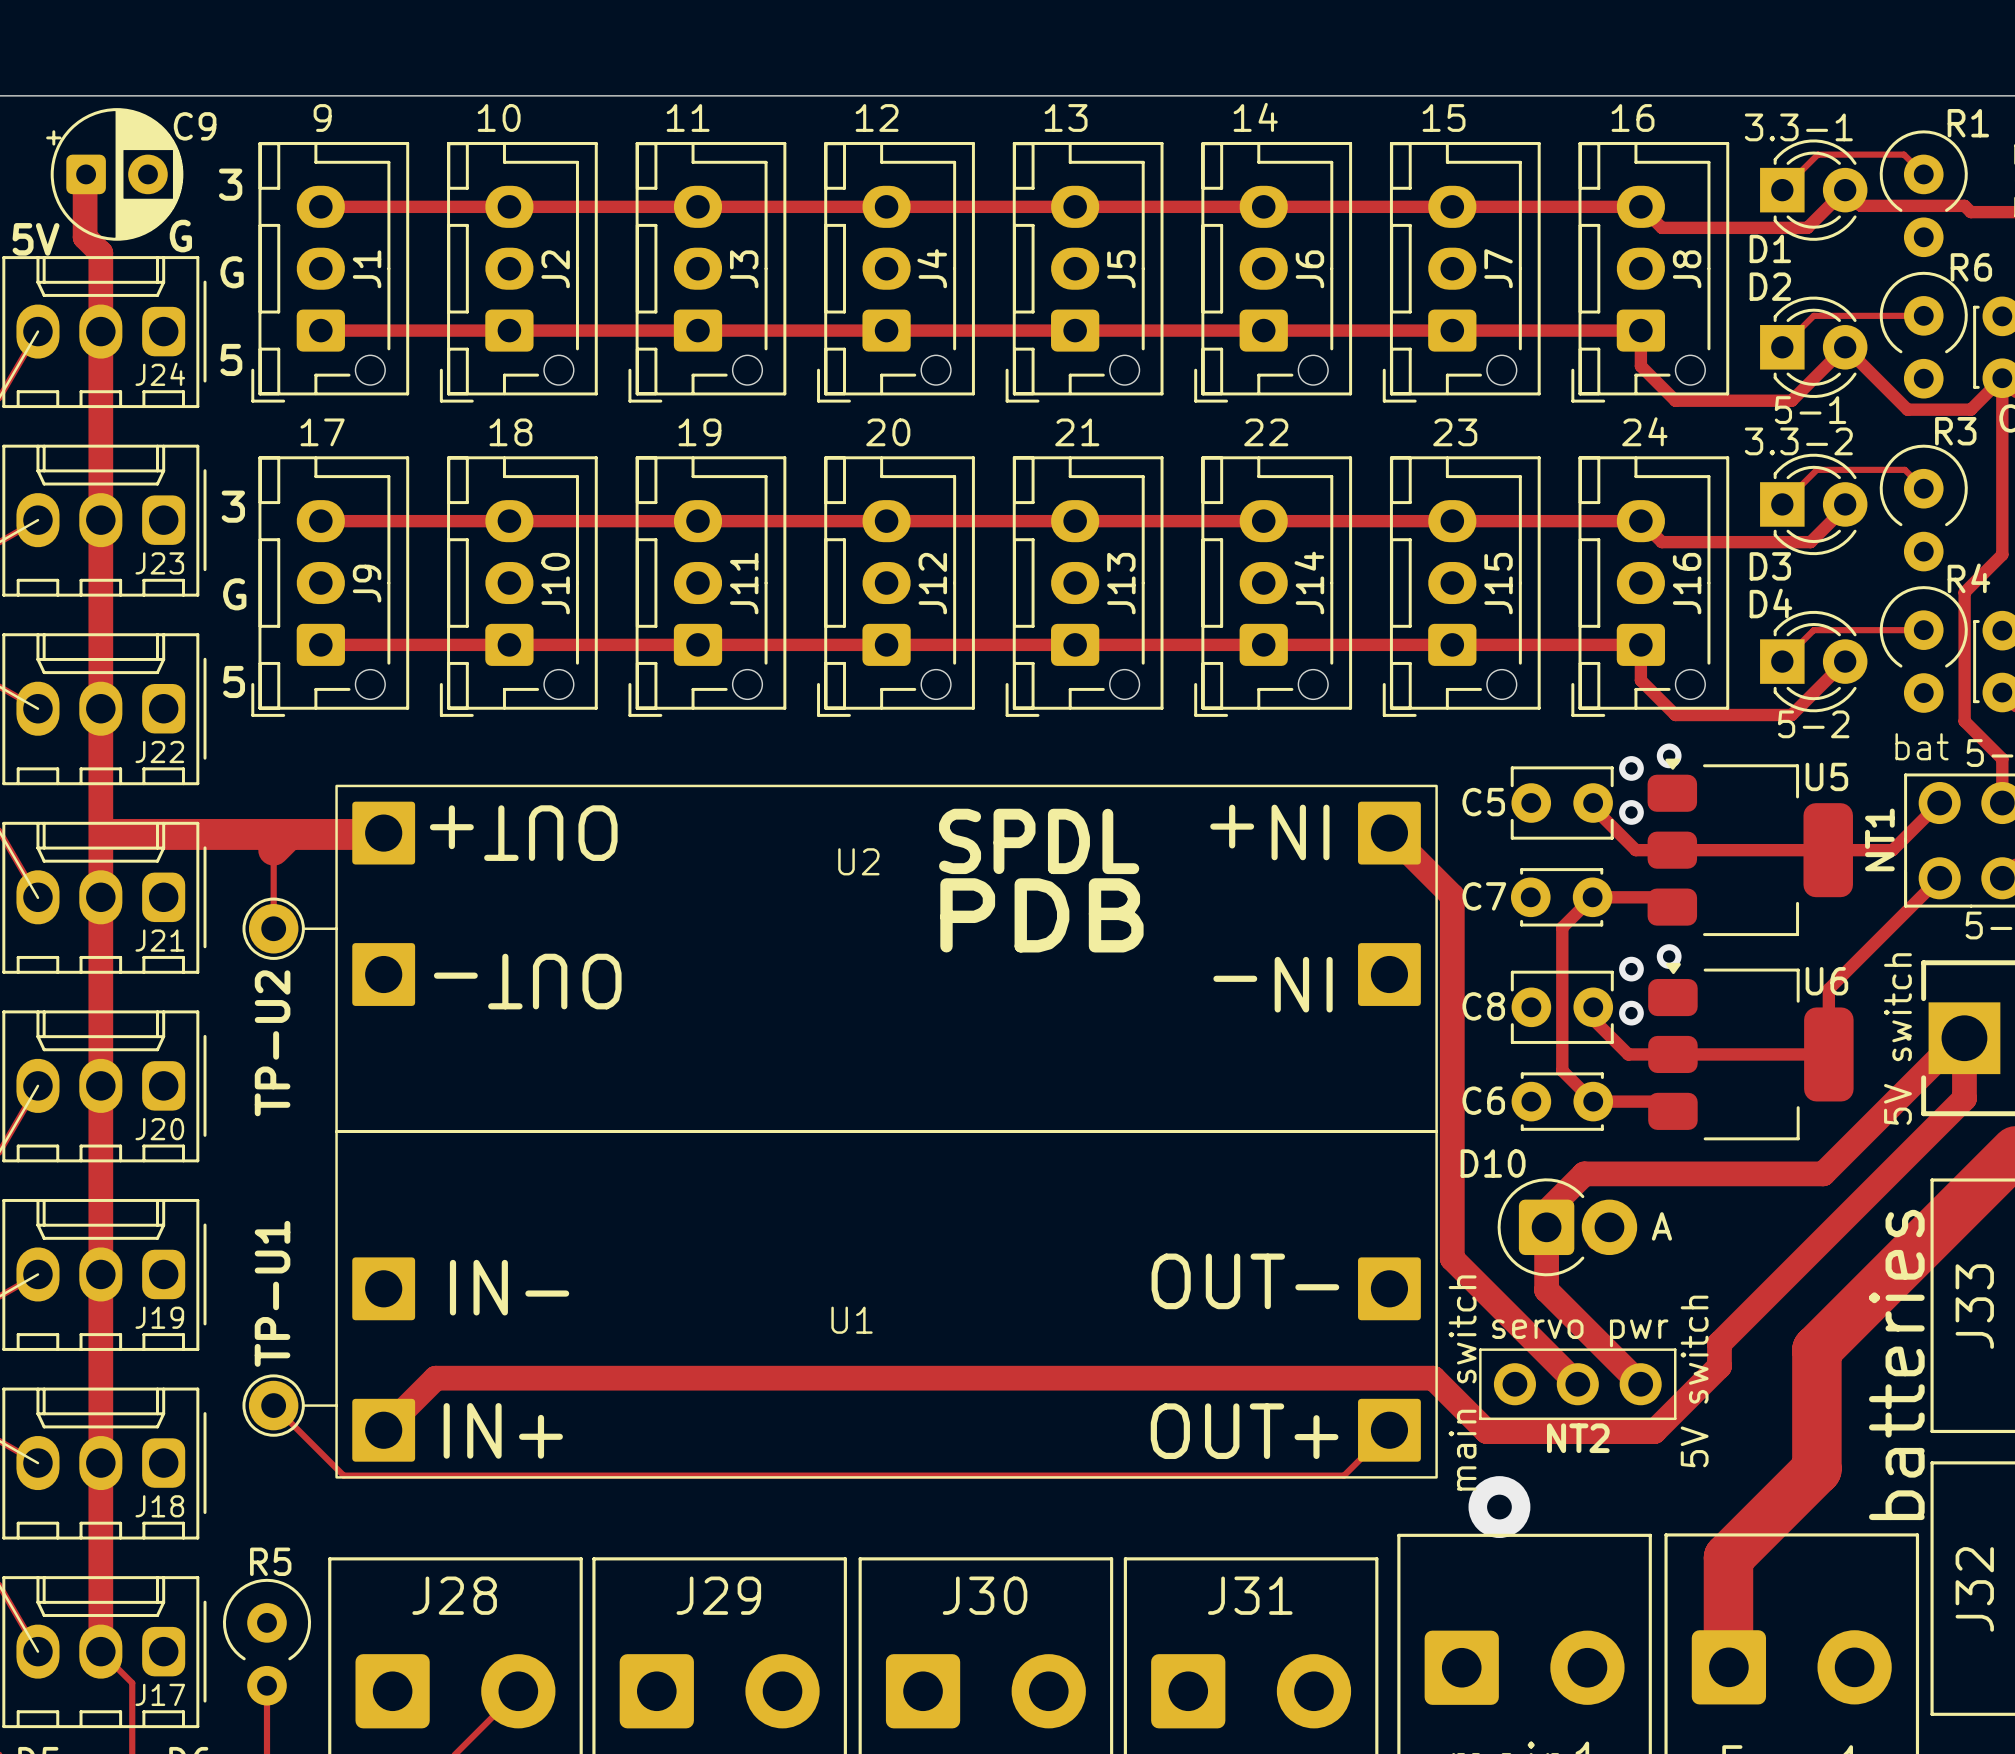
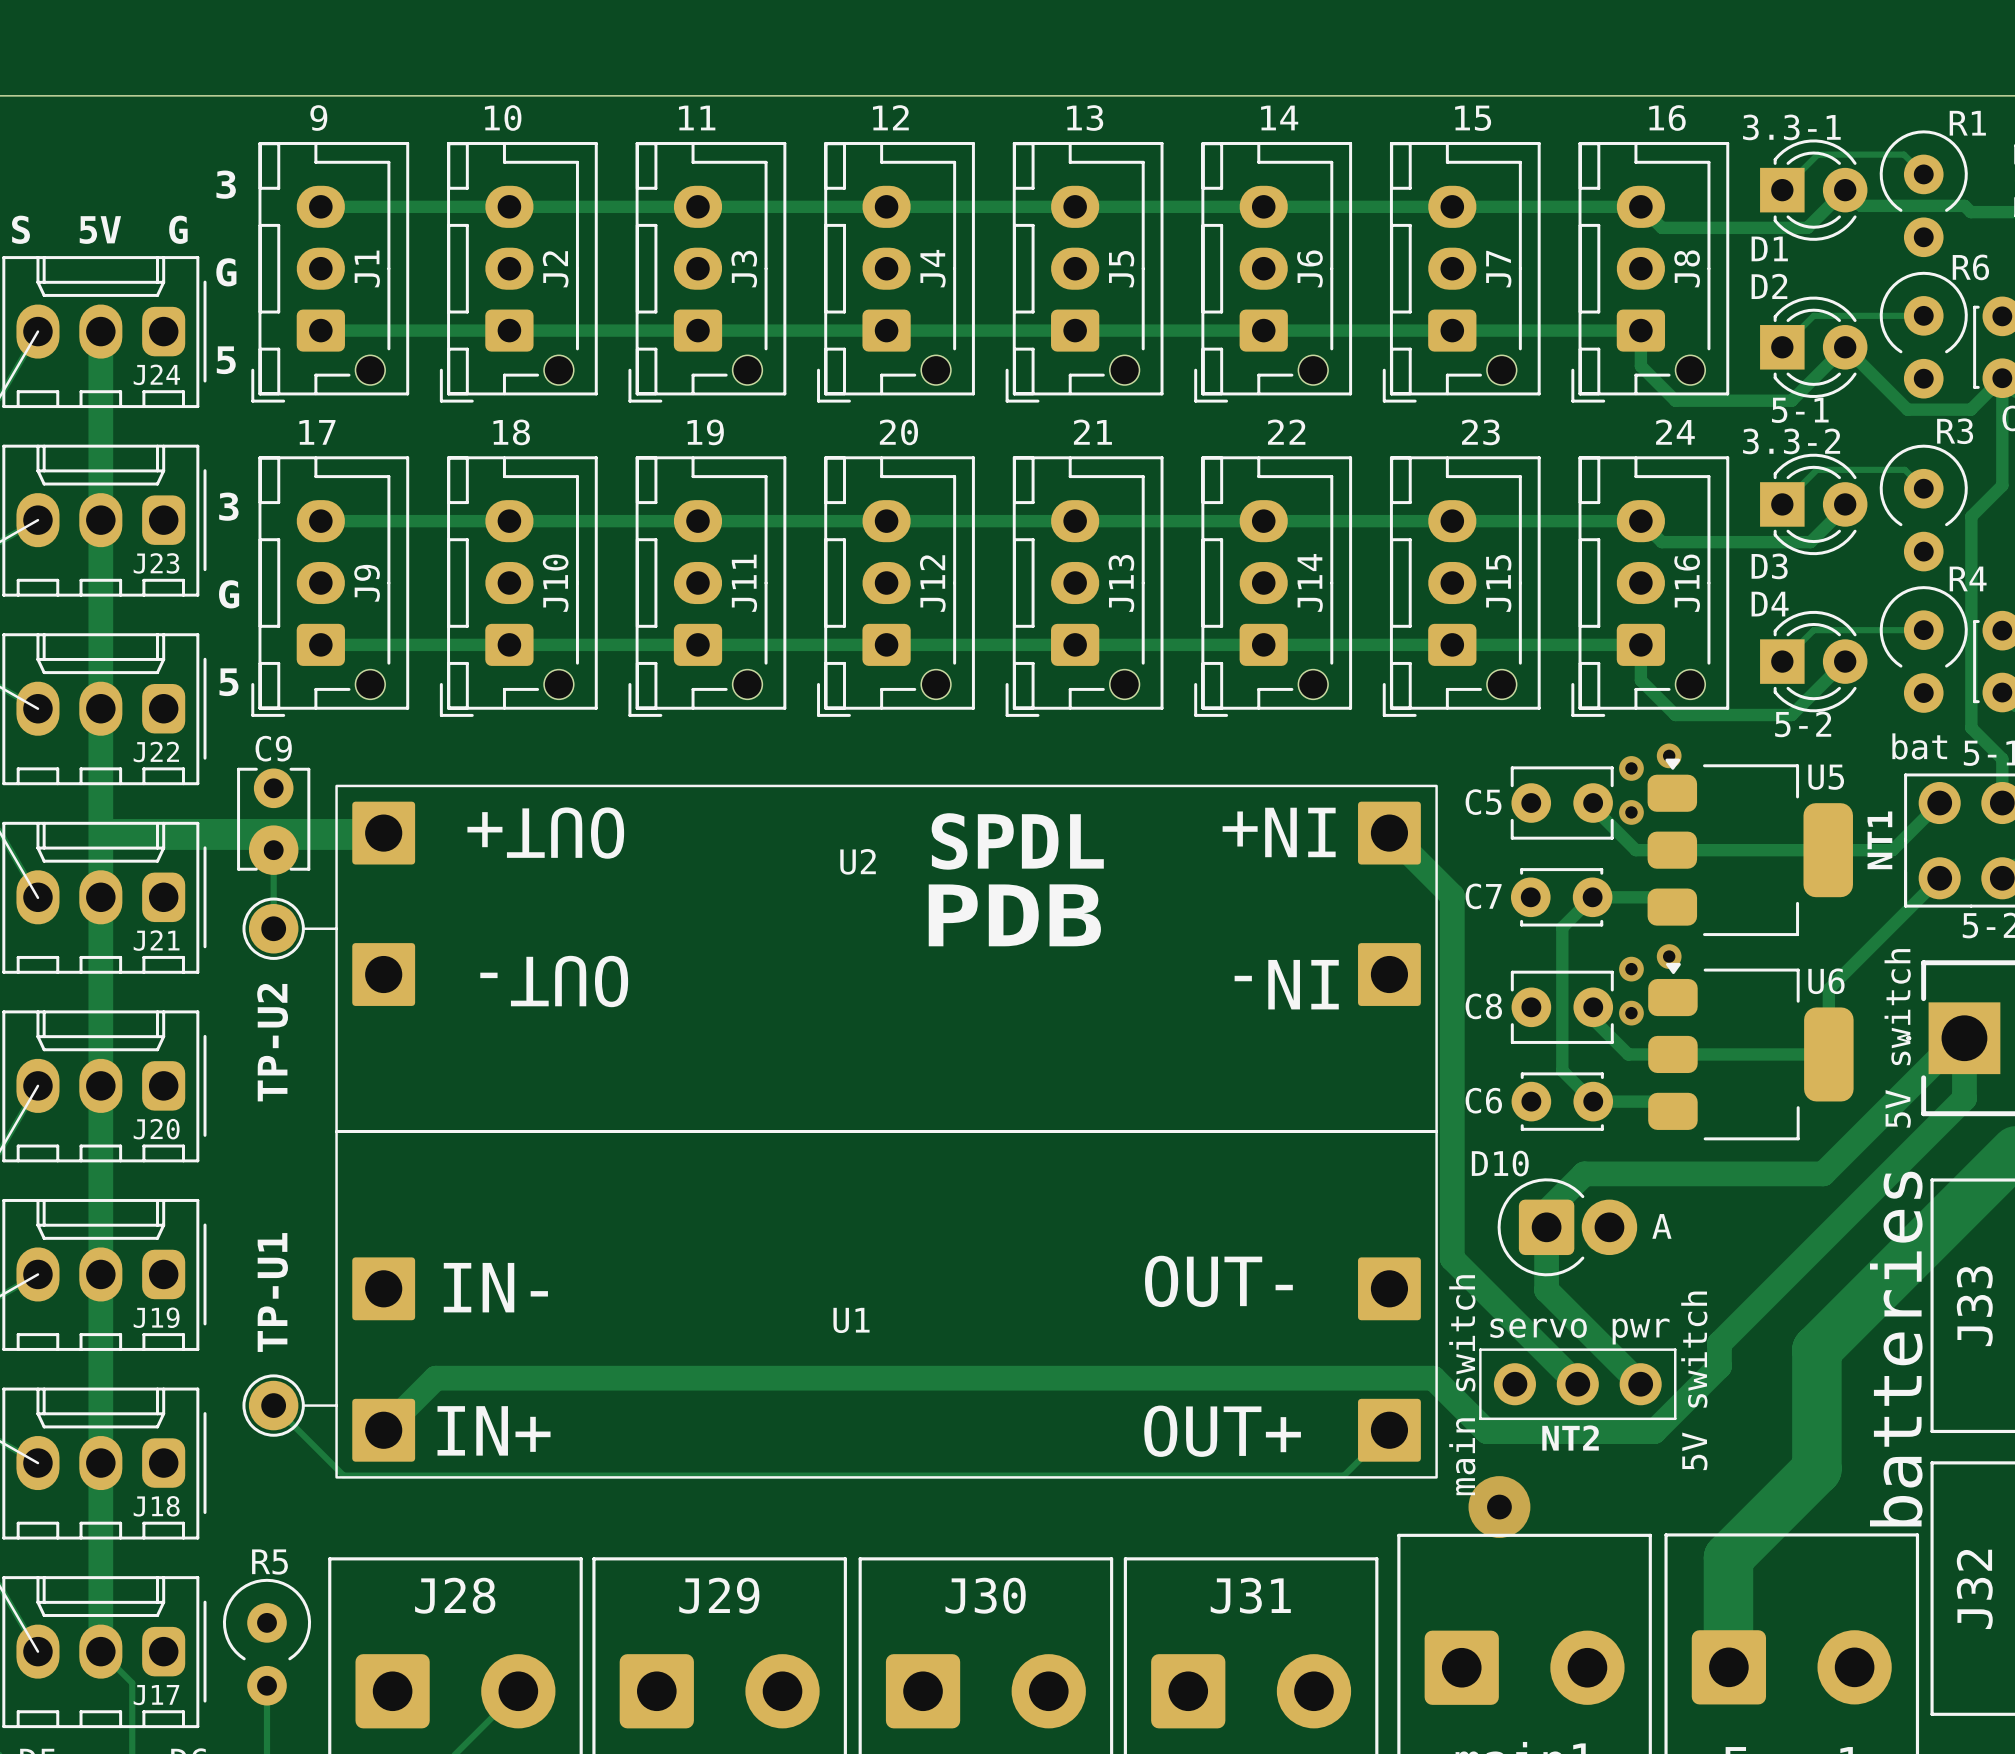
C9 footprint: [46, 108, 184, 241] -> [237, 767, 311, 875]
C9 name position: C9 (195, 126) -> C9 (273, 748)
track: (86, 174) (85, 237) (100, 253) (100, 331) -> none
text: G (180, 236) -> none
text: 5V (36, 239) -> S 5V G (99, 229)
track: (2002, 485) (2002, 554) (1964, 592) (1964, 721) (1971, 728) -> (2002, 485) (1971, 516) (1971, 728)

